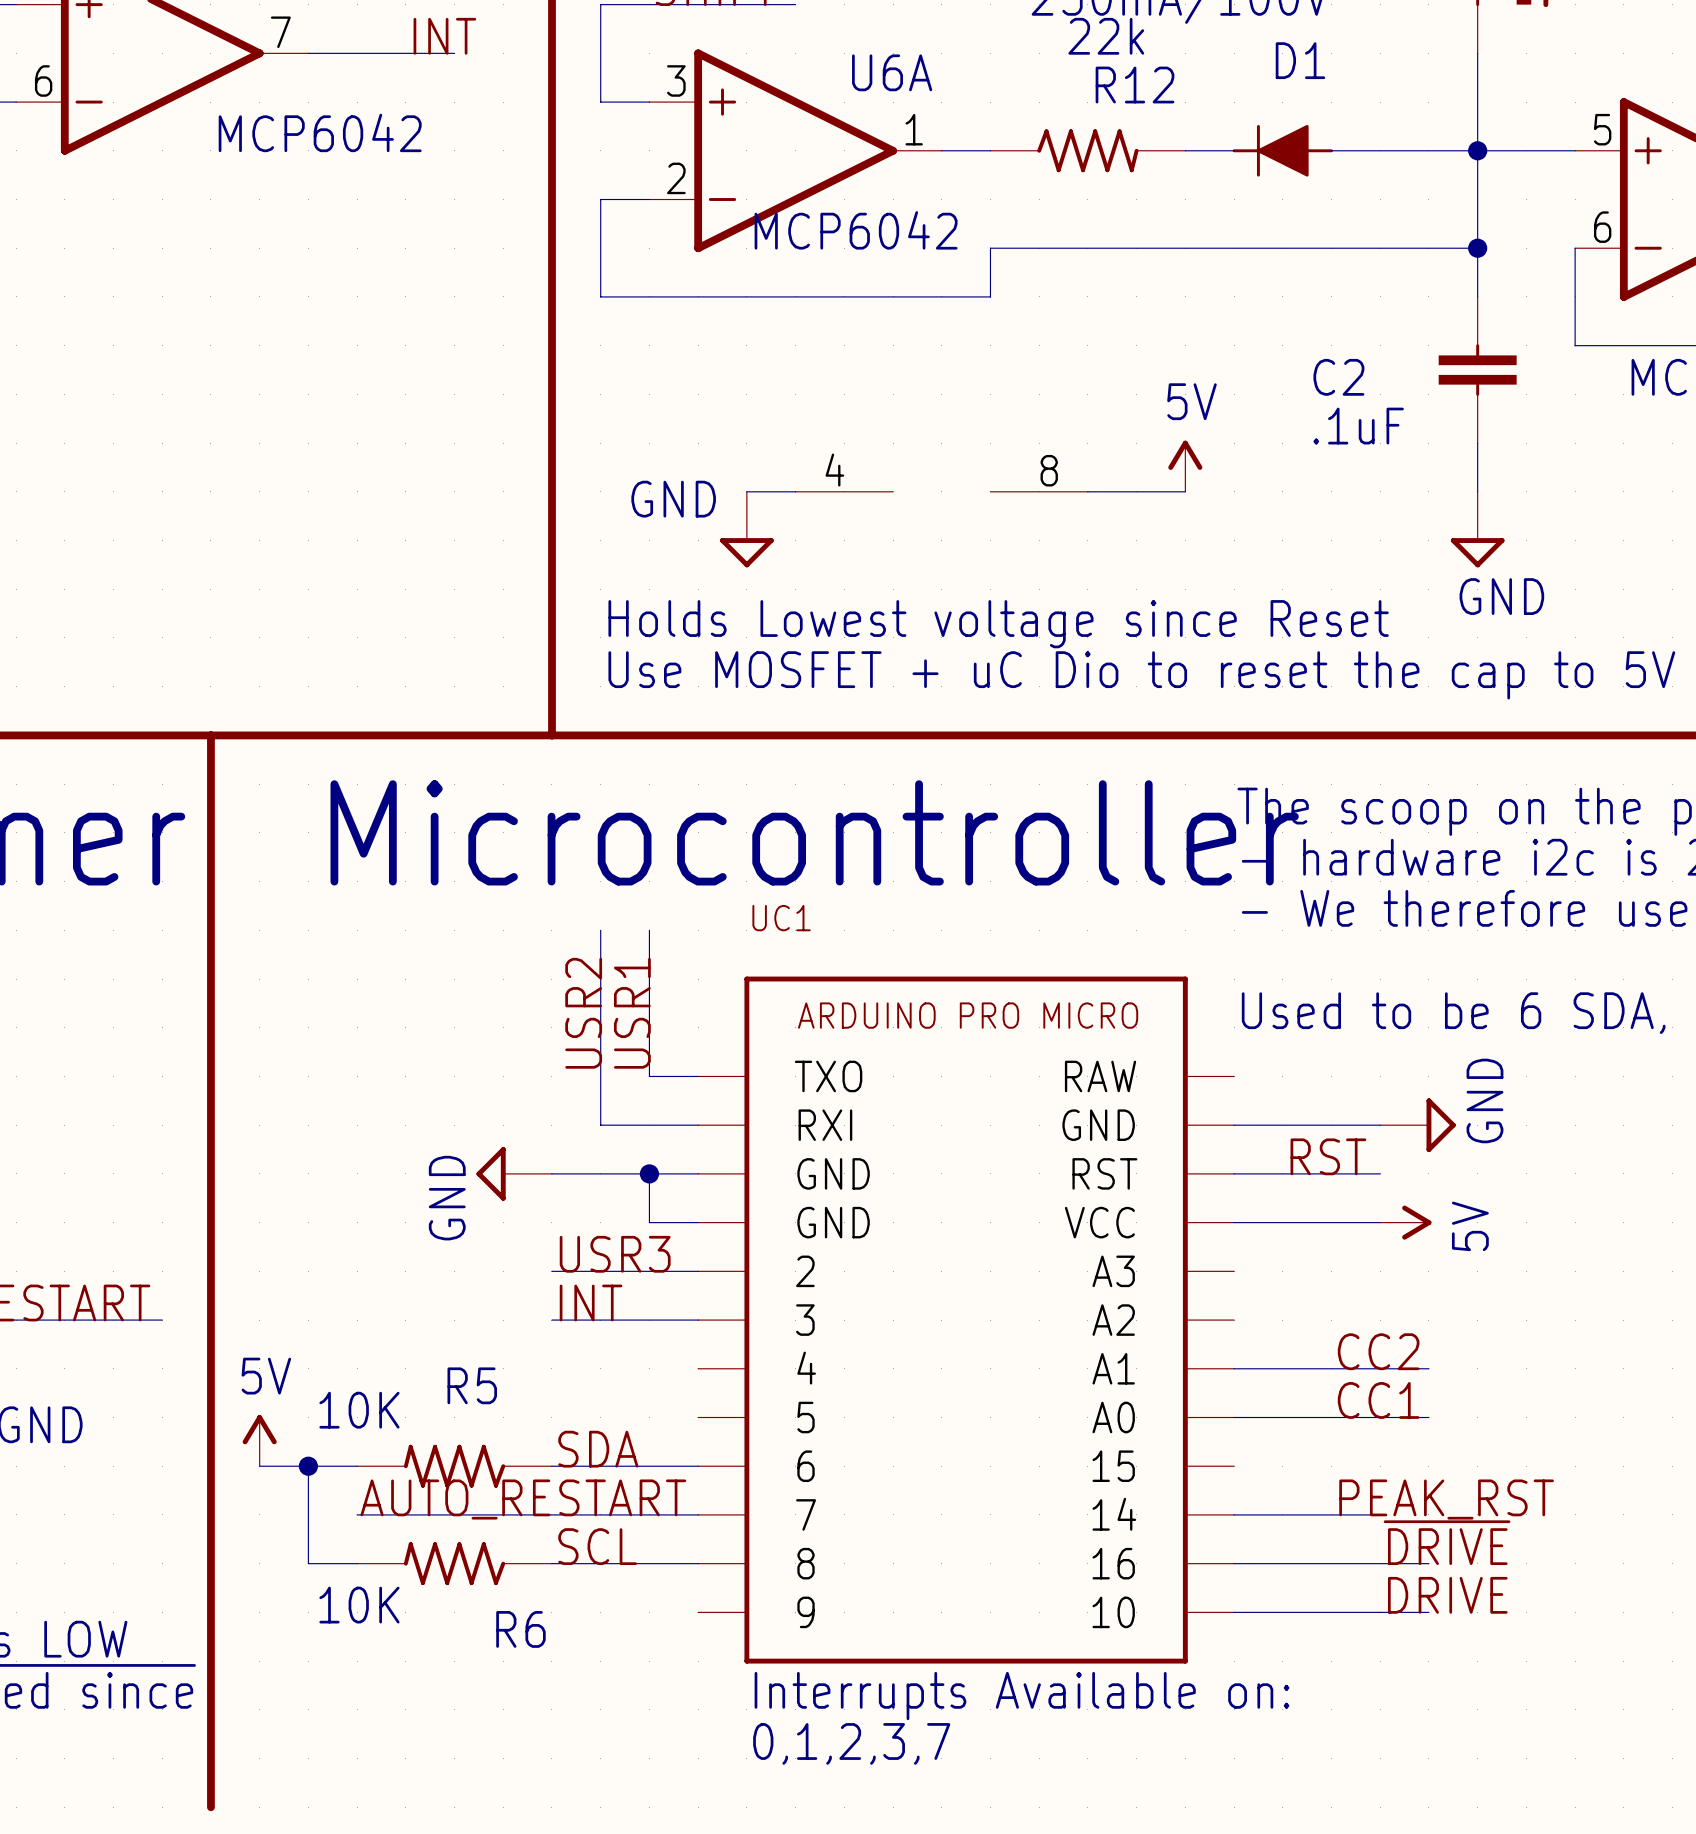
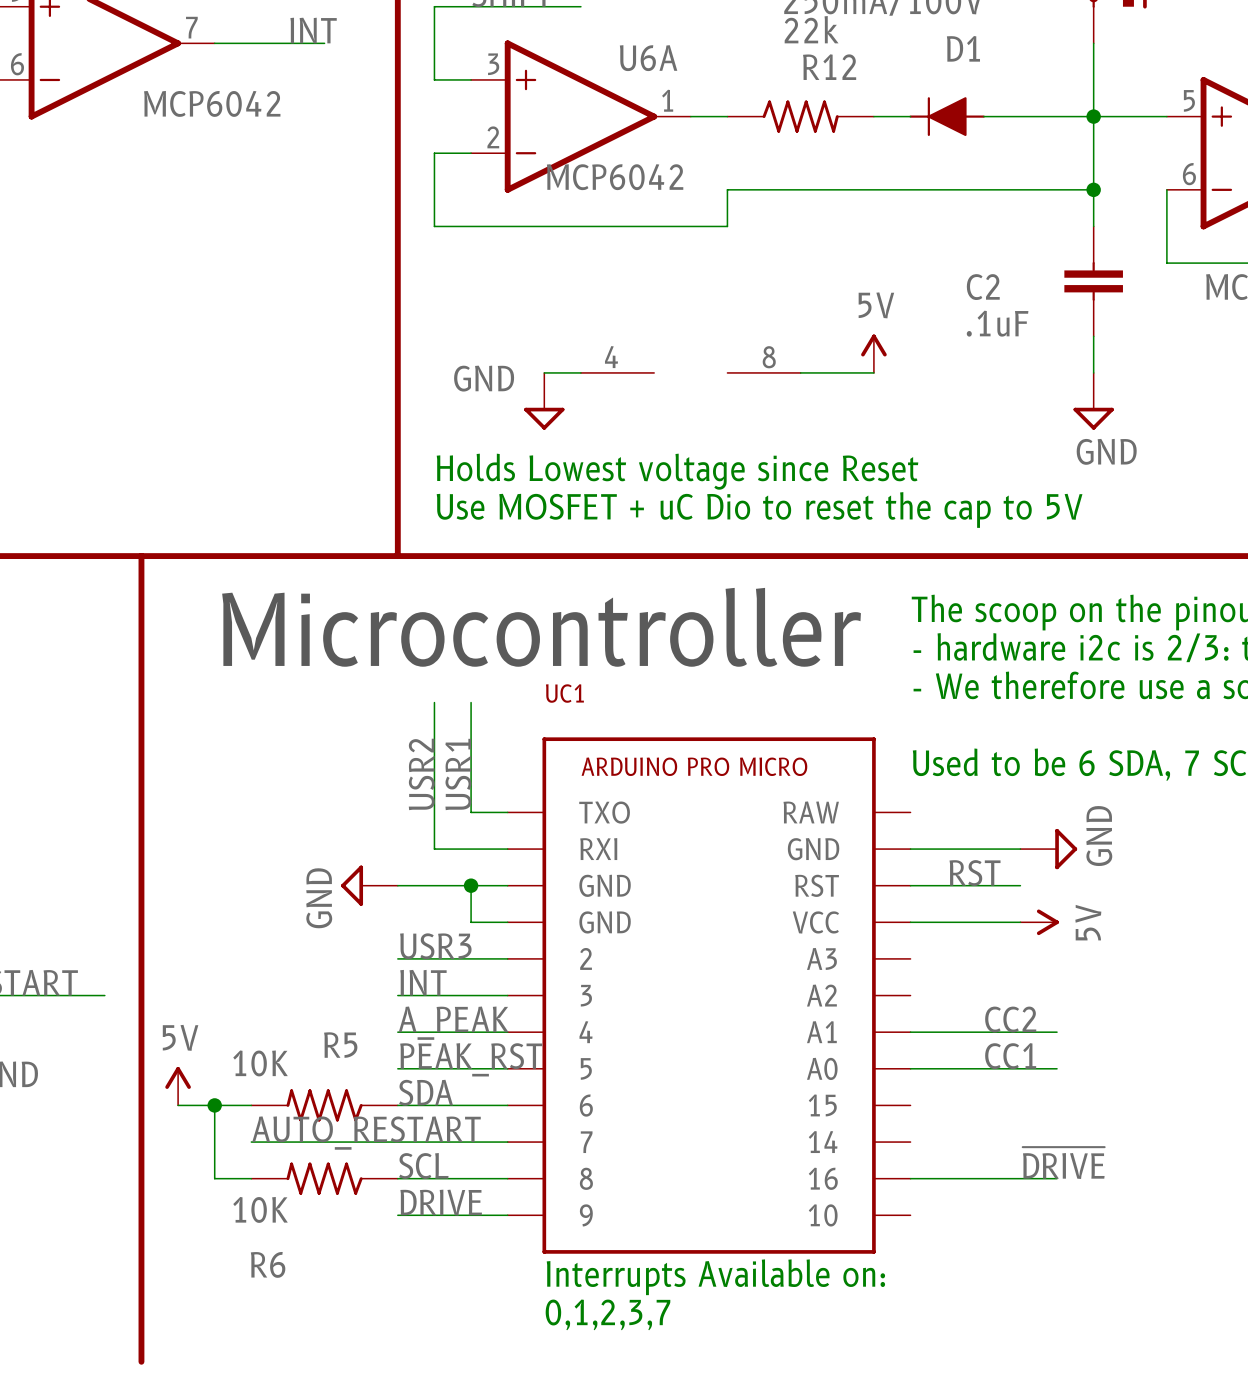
label: none -> A_PEAK (453, 1023)
wire: none -> (397, 1032) (507, 1032)
label: none -> PEAK_RST (471, 1059)
wire: none -> (397, 1068) (507, 1068)
label: PEAK_RST (1446, 1499) -> none
wire: (1234, 1514) (1380, 1514) -> none
label: none -> DRIVE (441, 1202)
label: DRIVE (1447, 1595) -> none
wire: none -> (397, 1215) (507, 1215)
wire: (1234, 1612) (1428, 1612) -> none
R6 name position: R6 (520, 1629) -> R6 (268, 1264)

